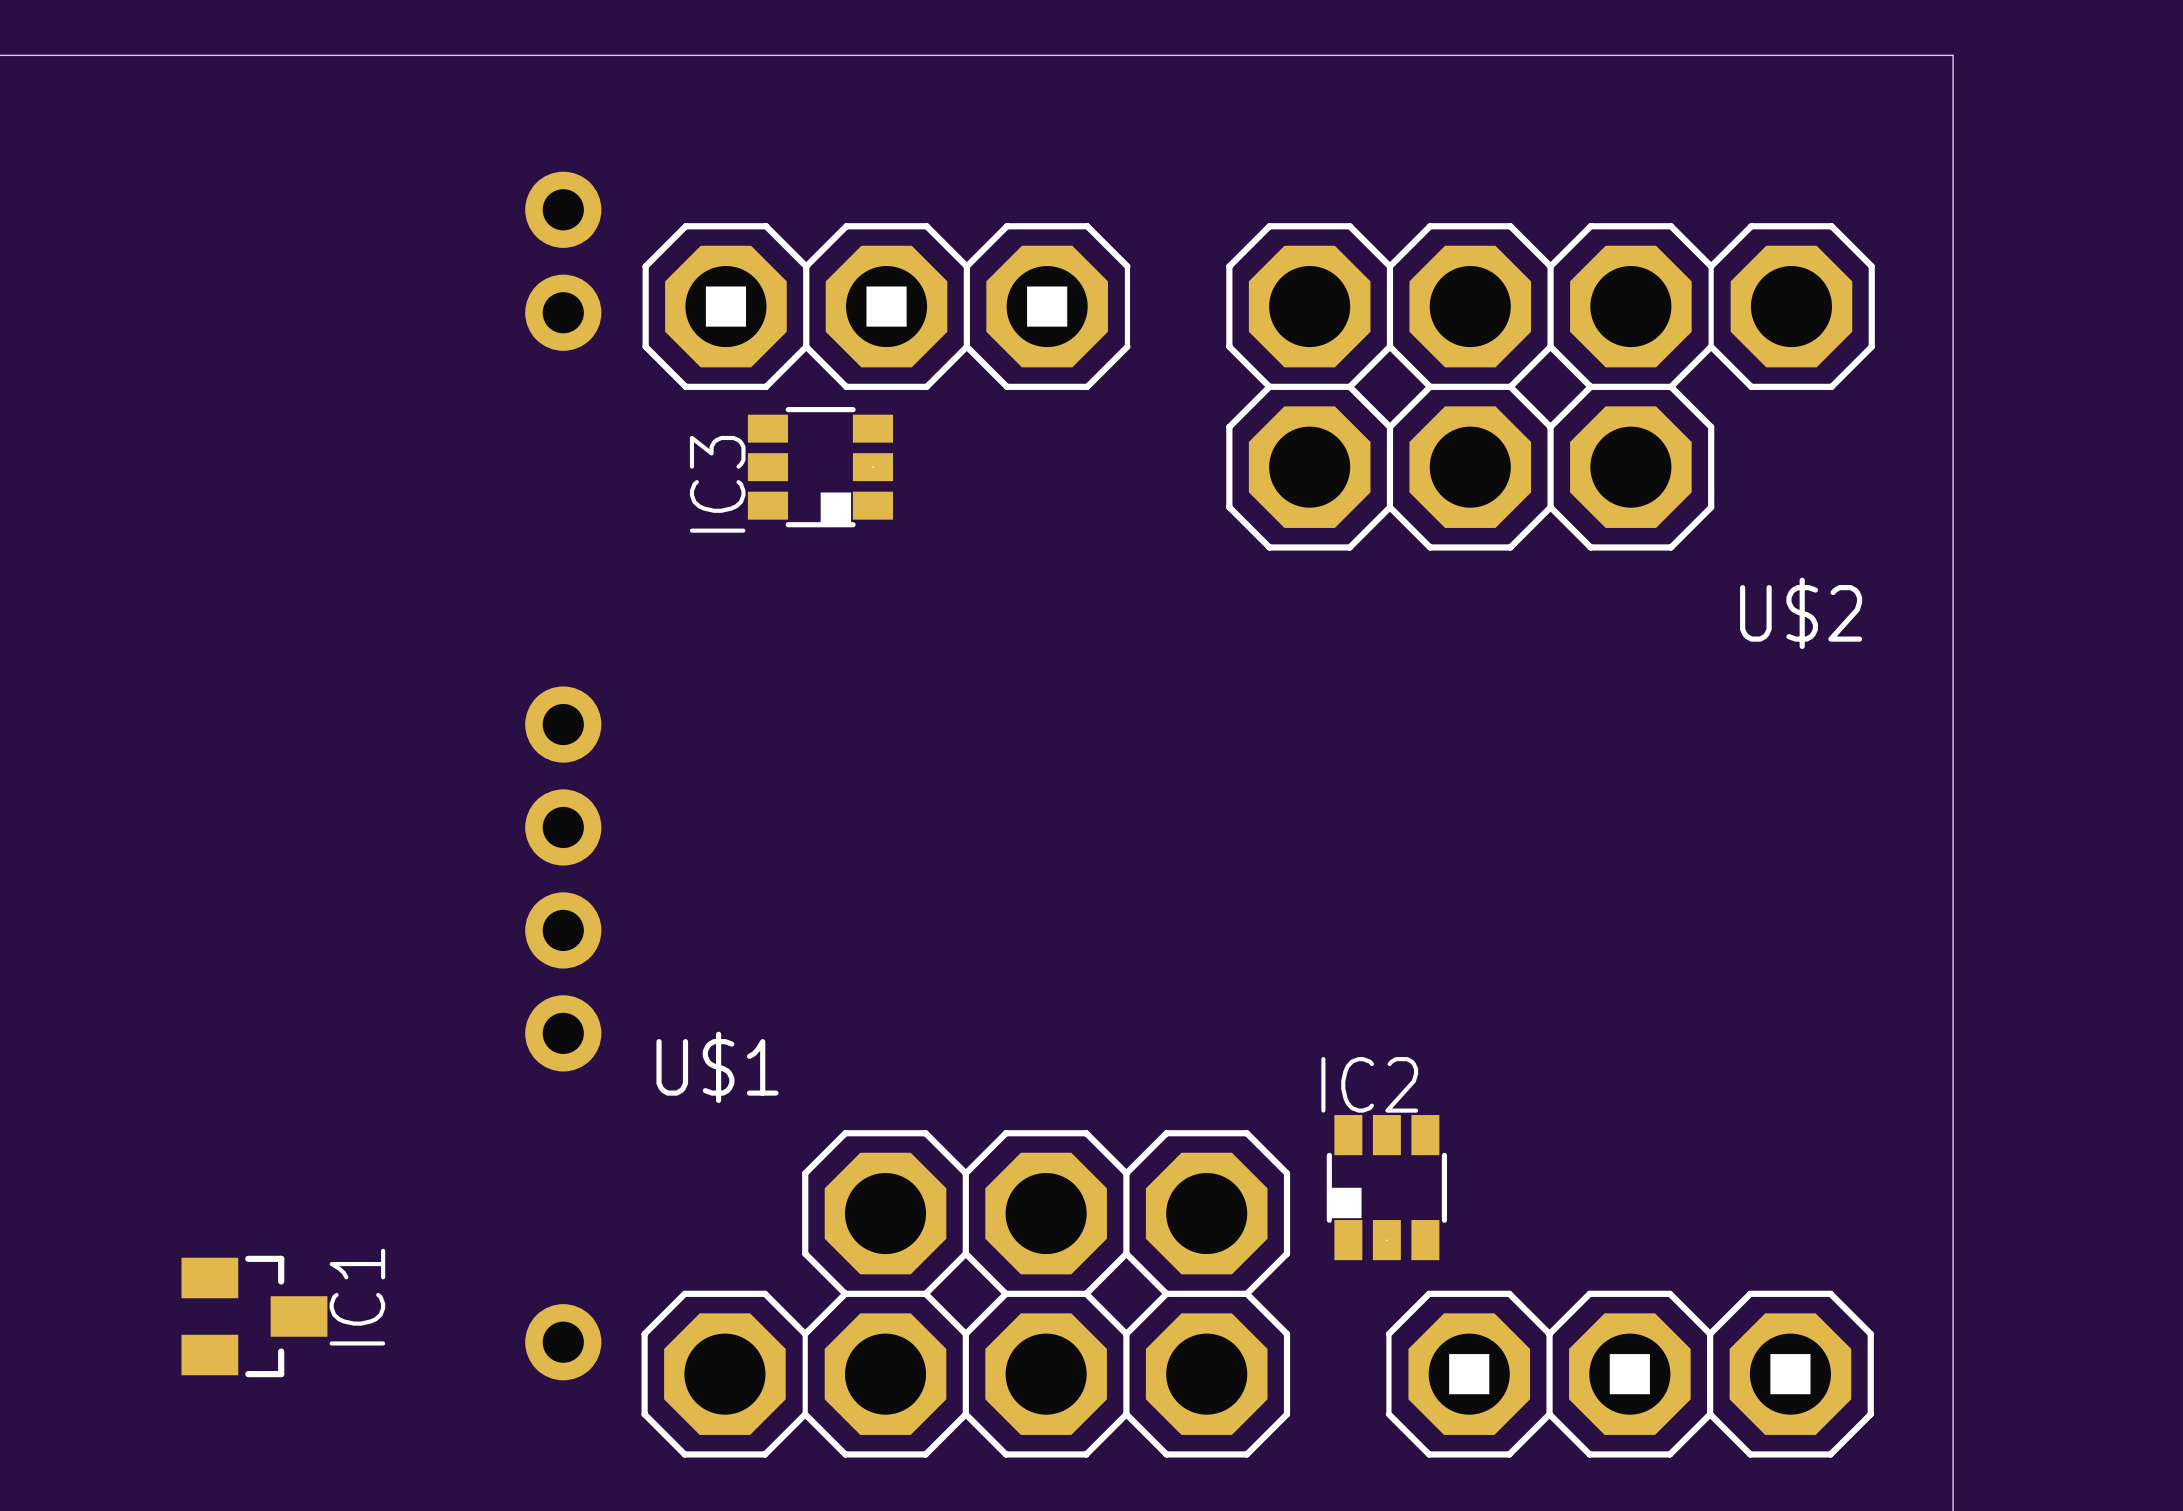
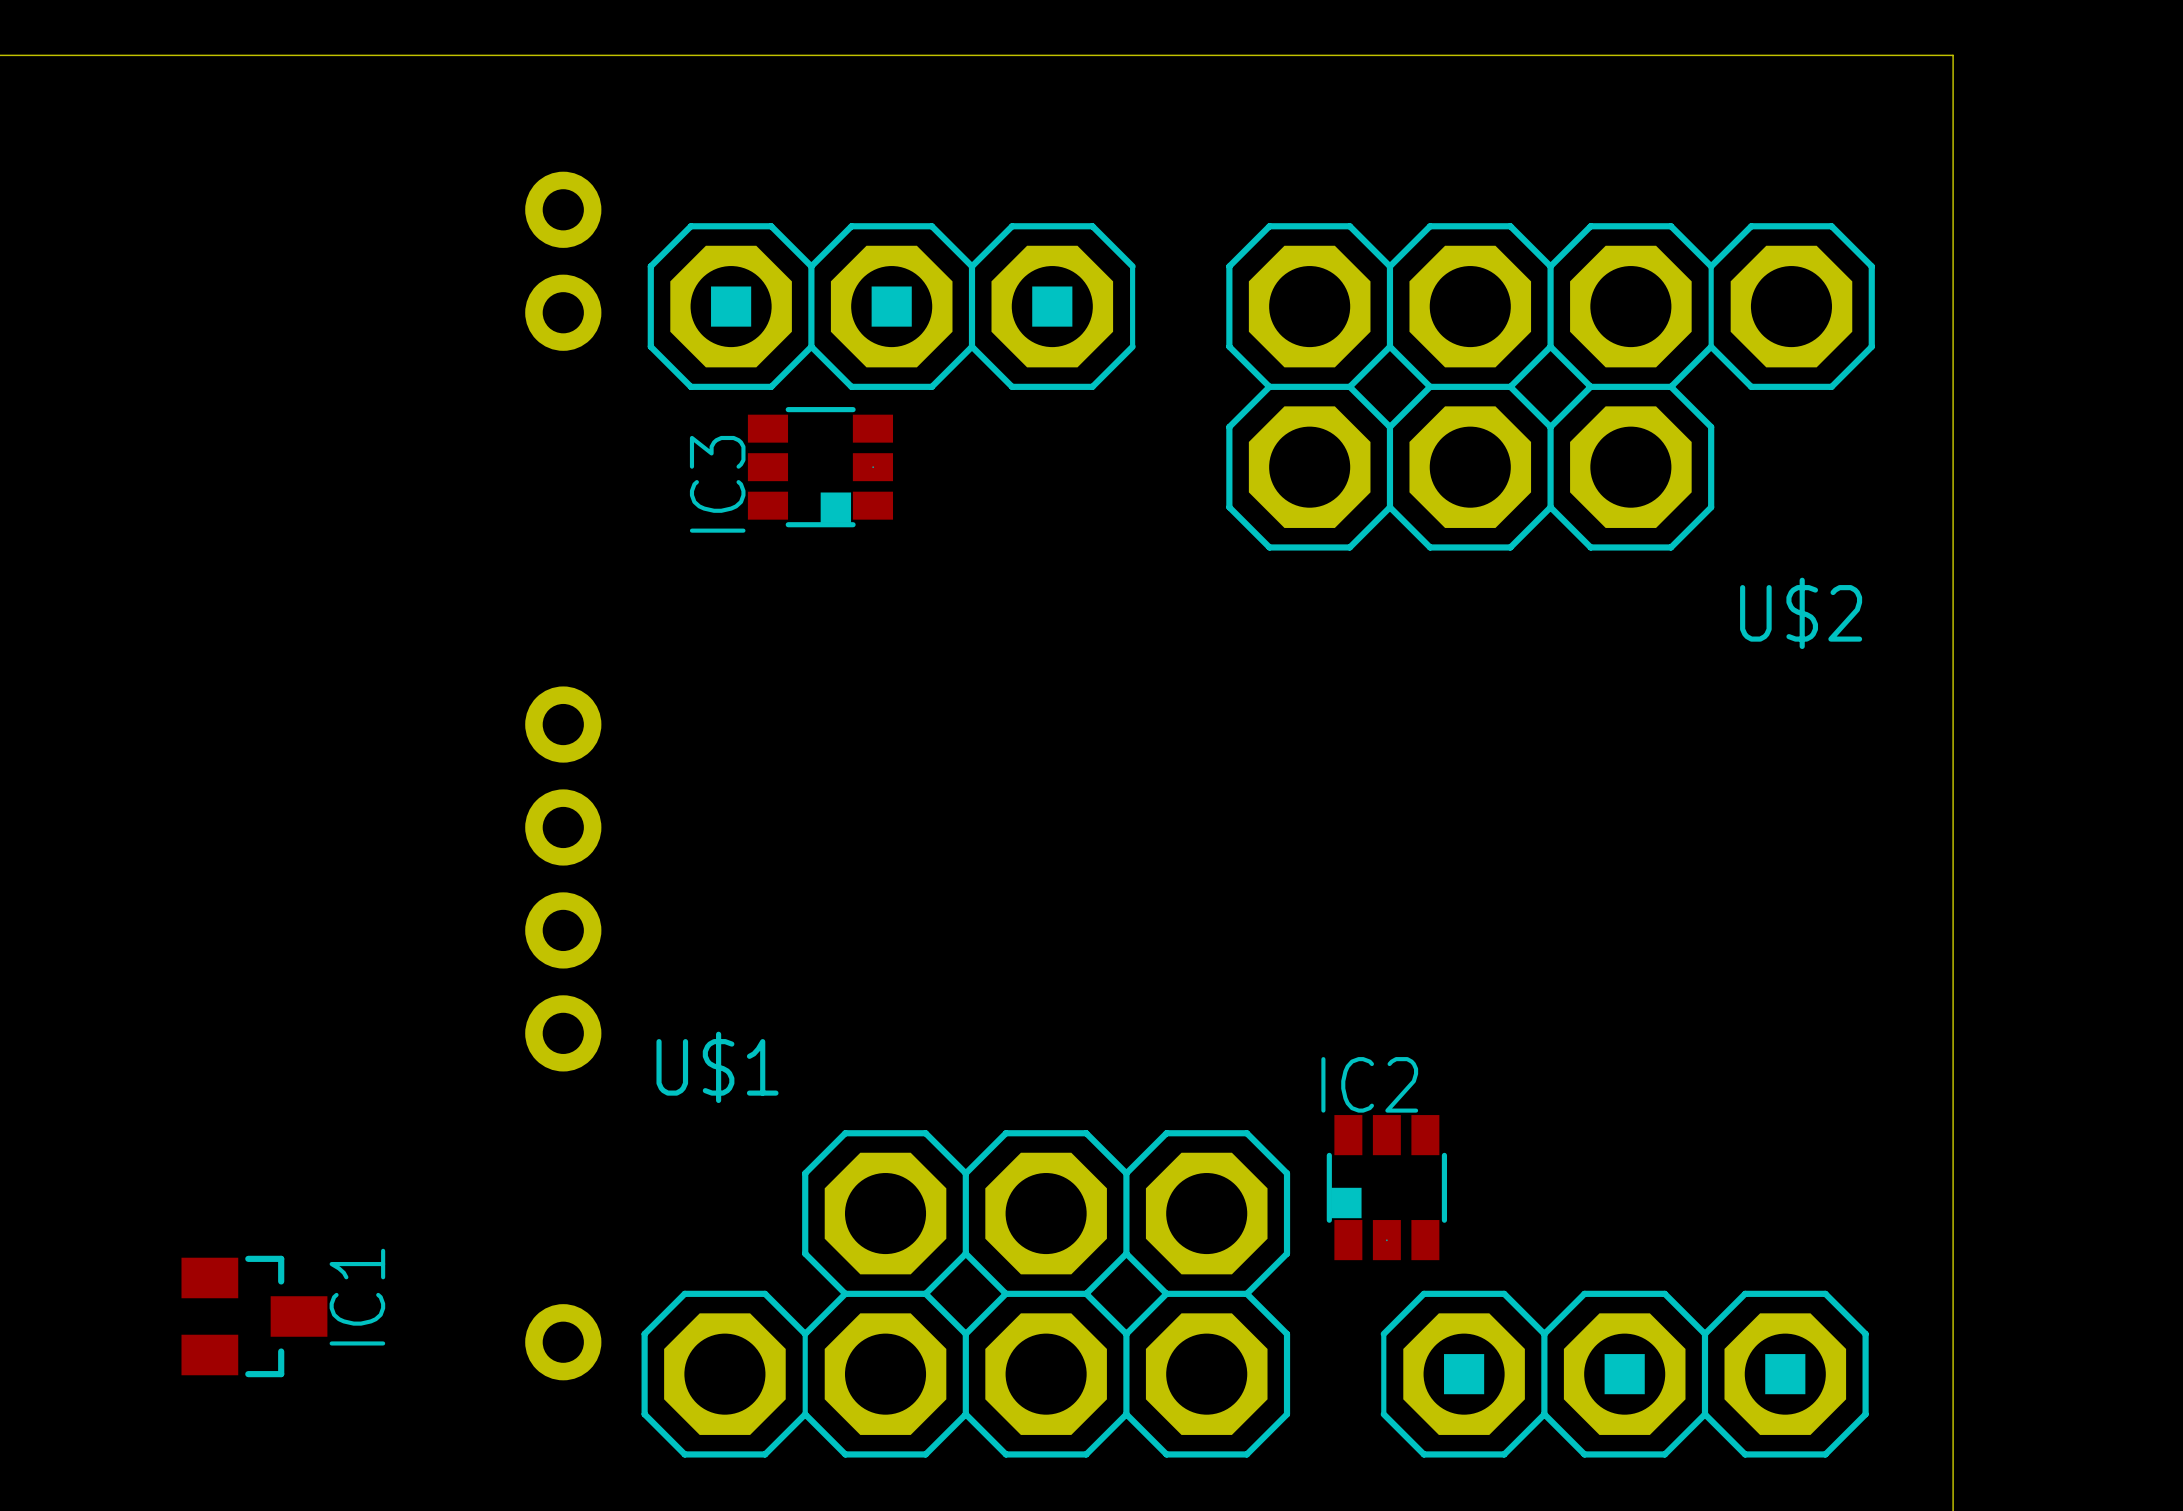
U$2 footprint: [642, 223, 1875, 551] -> [647, 223, 1875, 551]
U$1 footprint: [641, 1130, 1874, 1458] -> [641, 1130, 1869, 1458]

